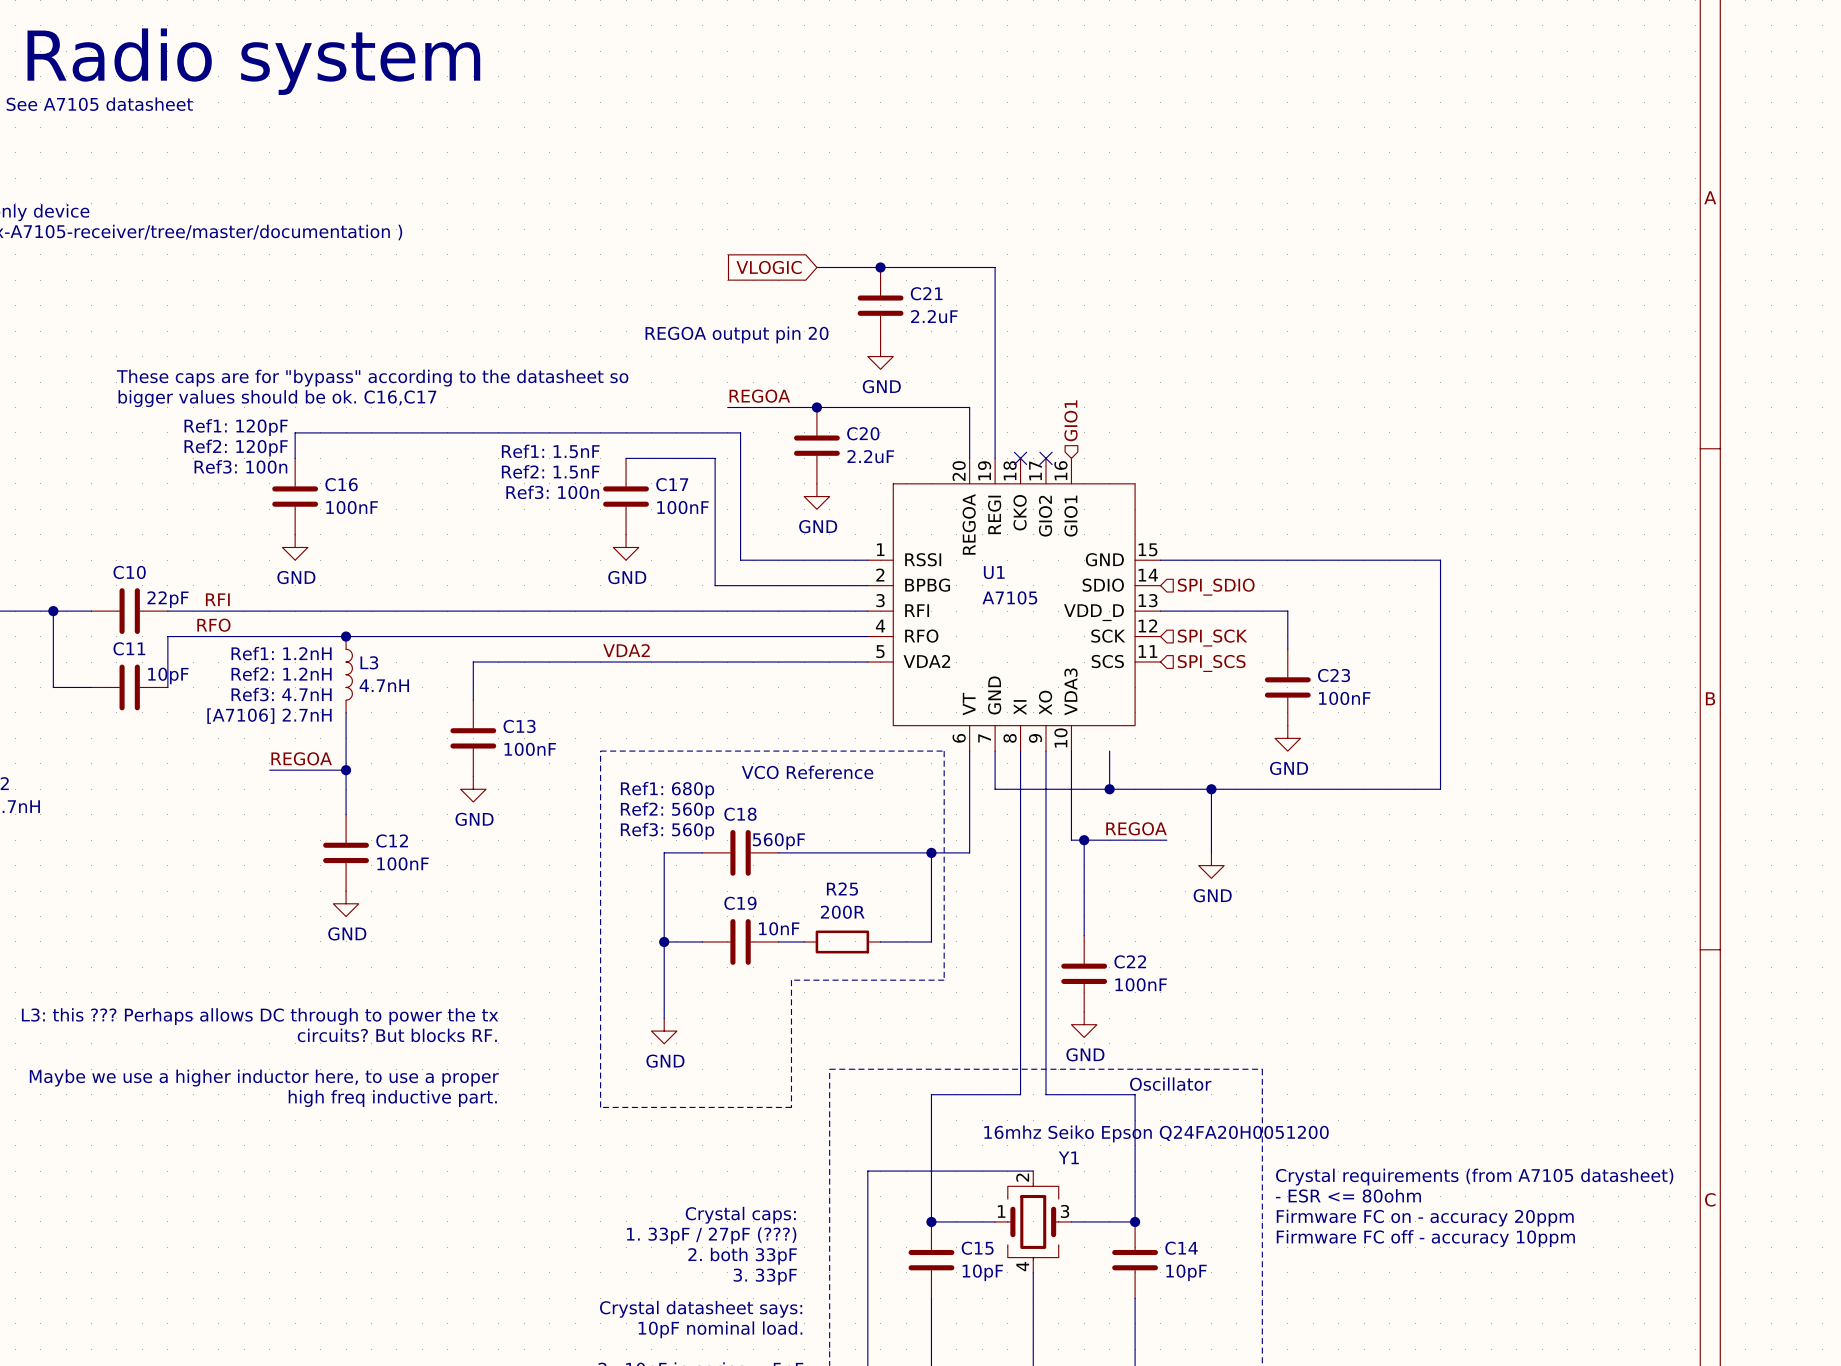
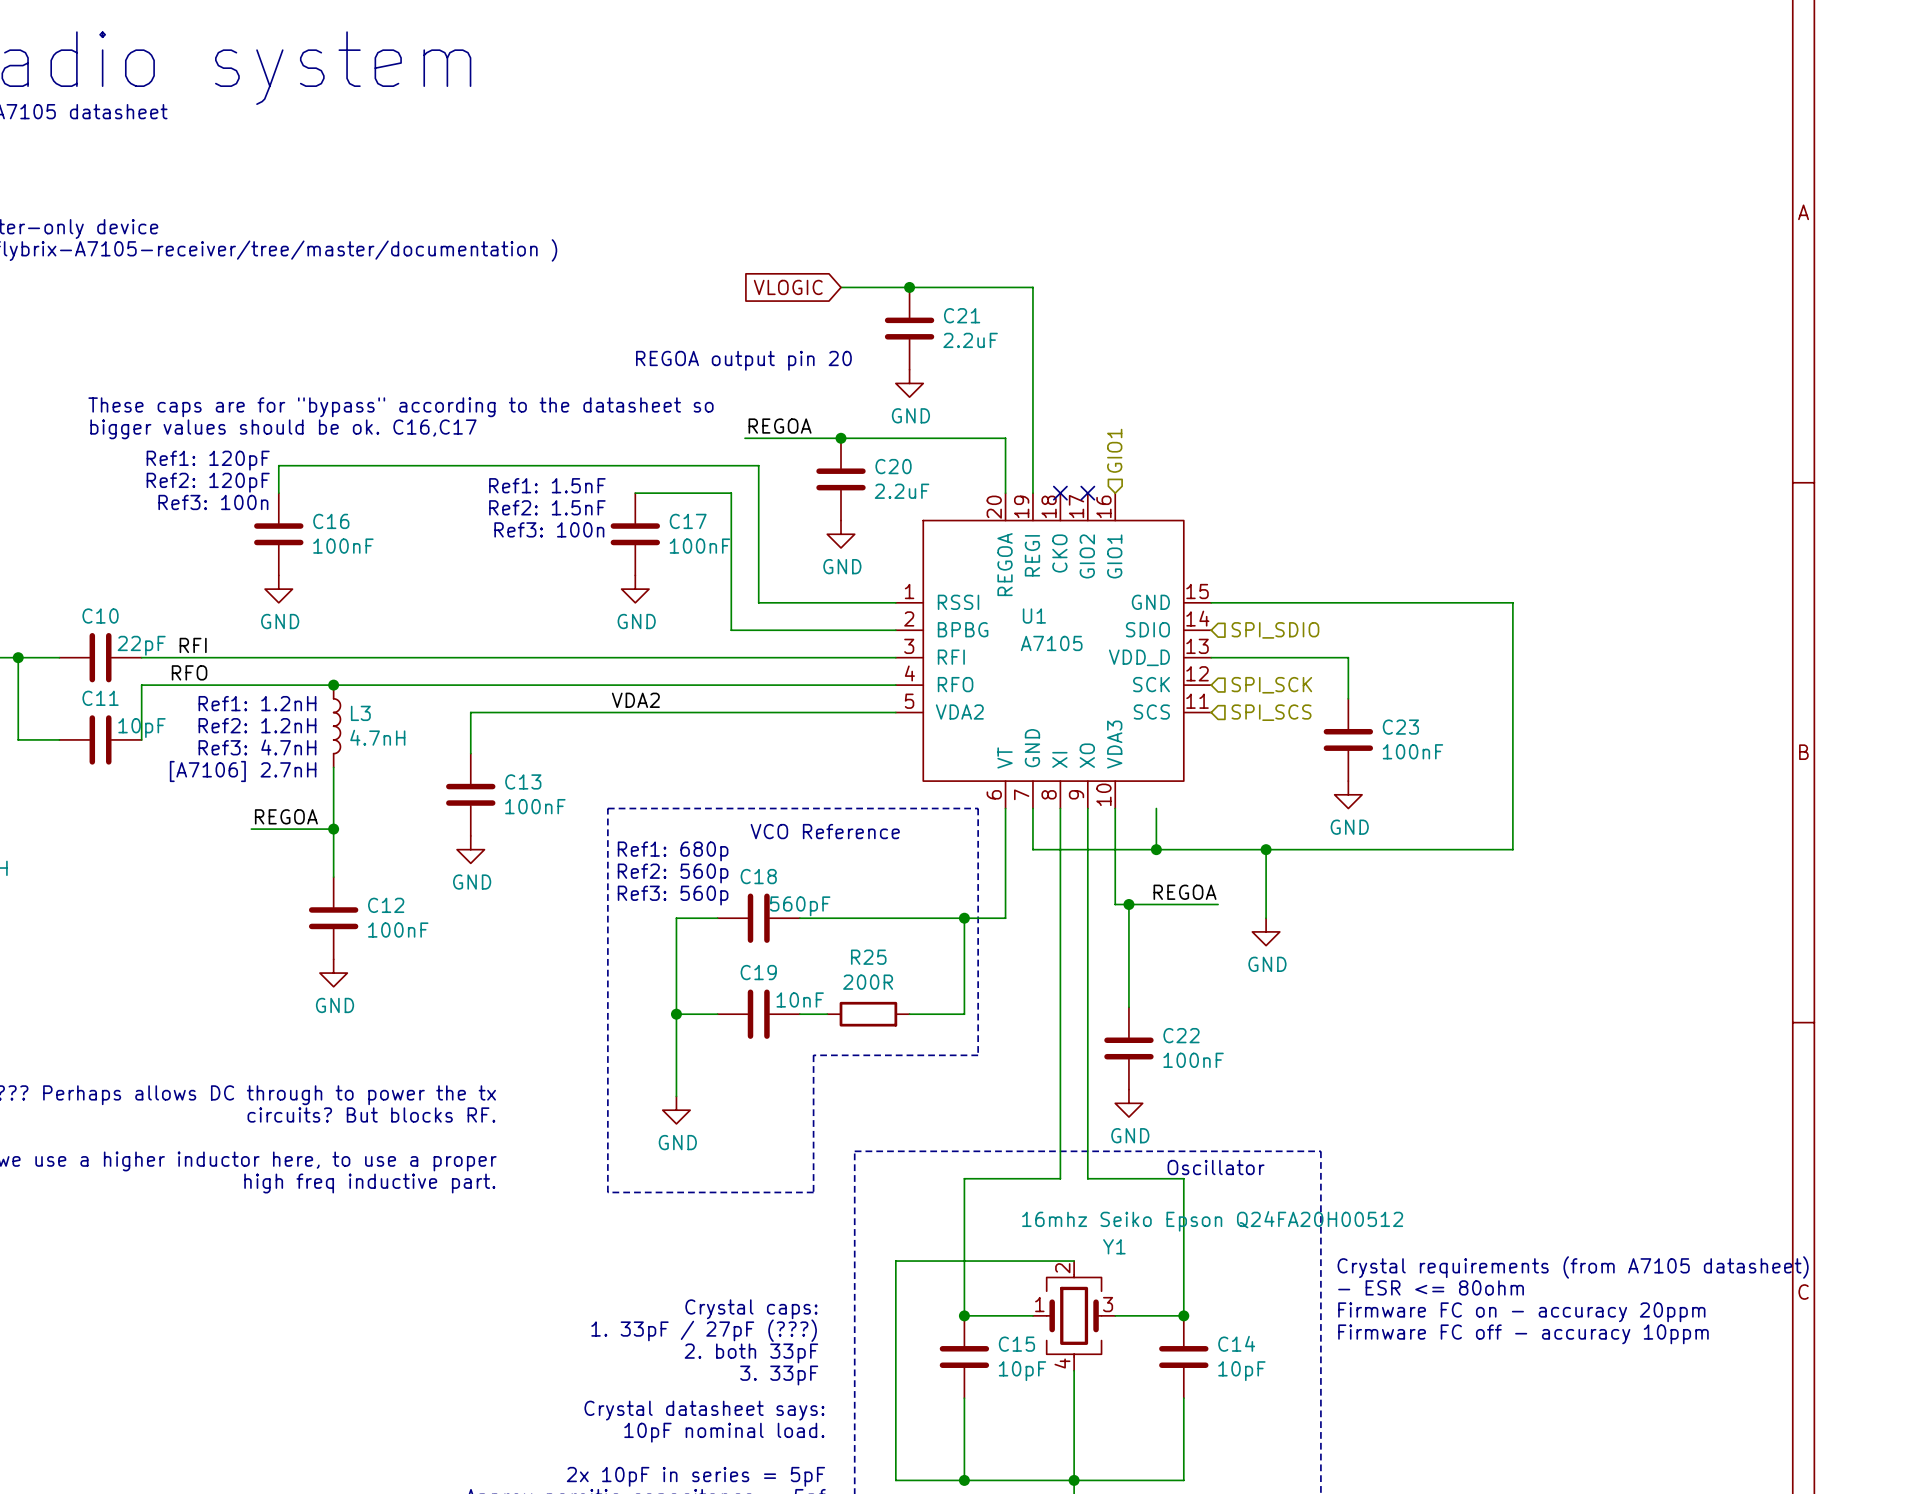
Y1 value: 16mhz Seiko Epson Q24FA20H0051200 (1156, 1133) -> 16mhz Seiko Epson Q24FA20H00512 (1212, 1221)

